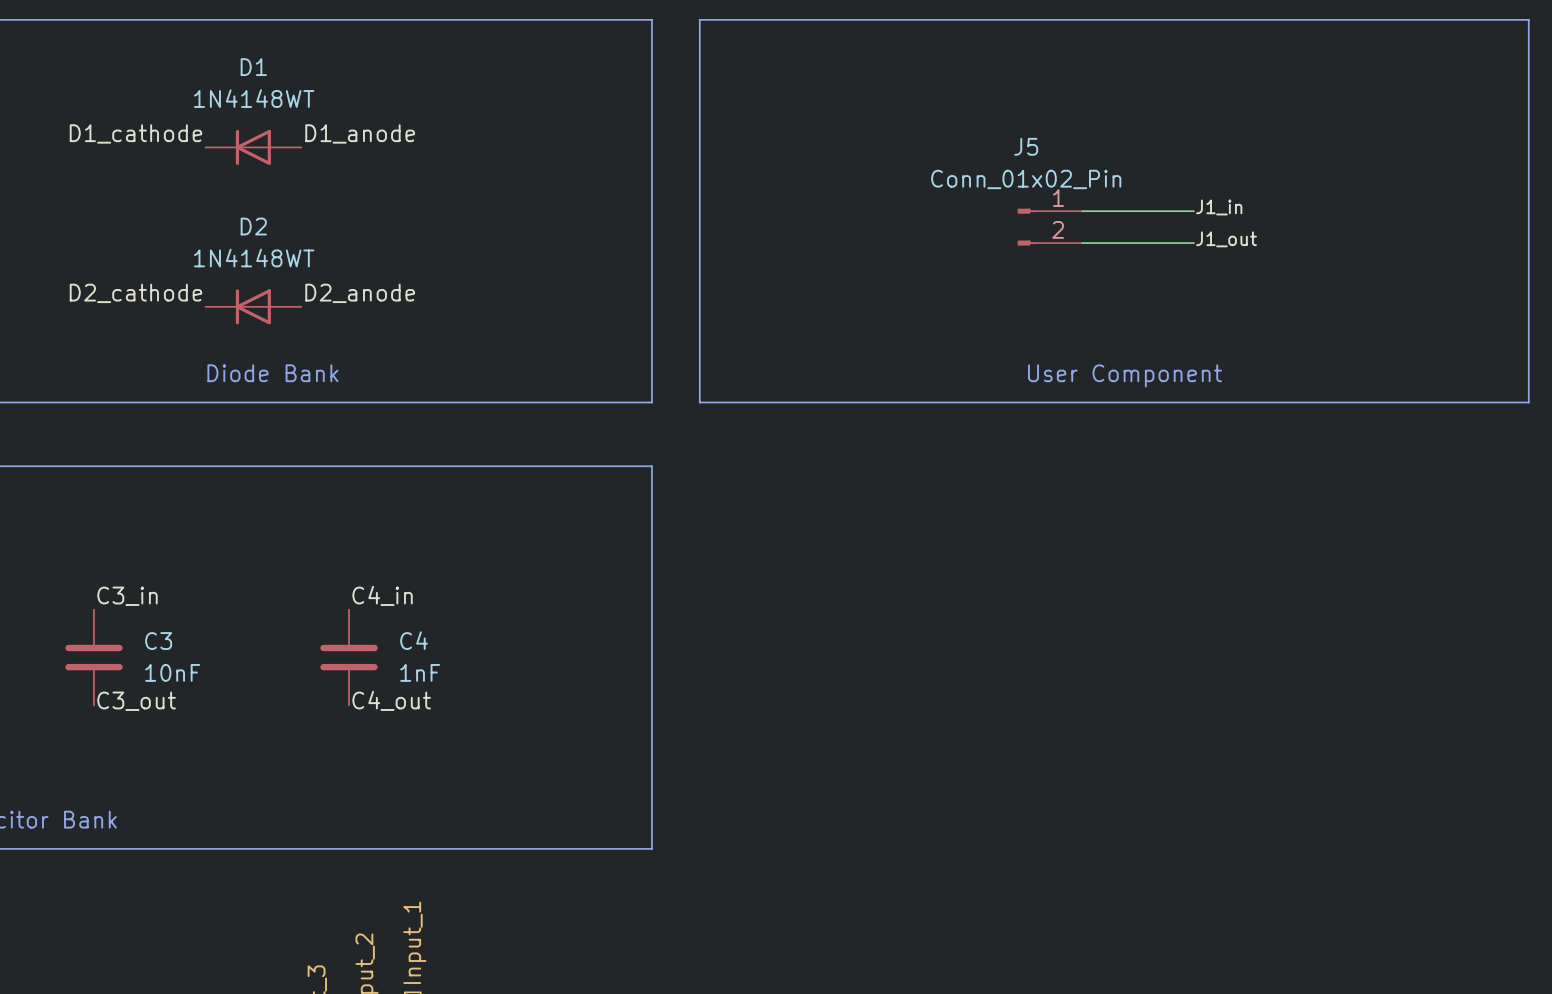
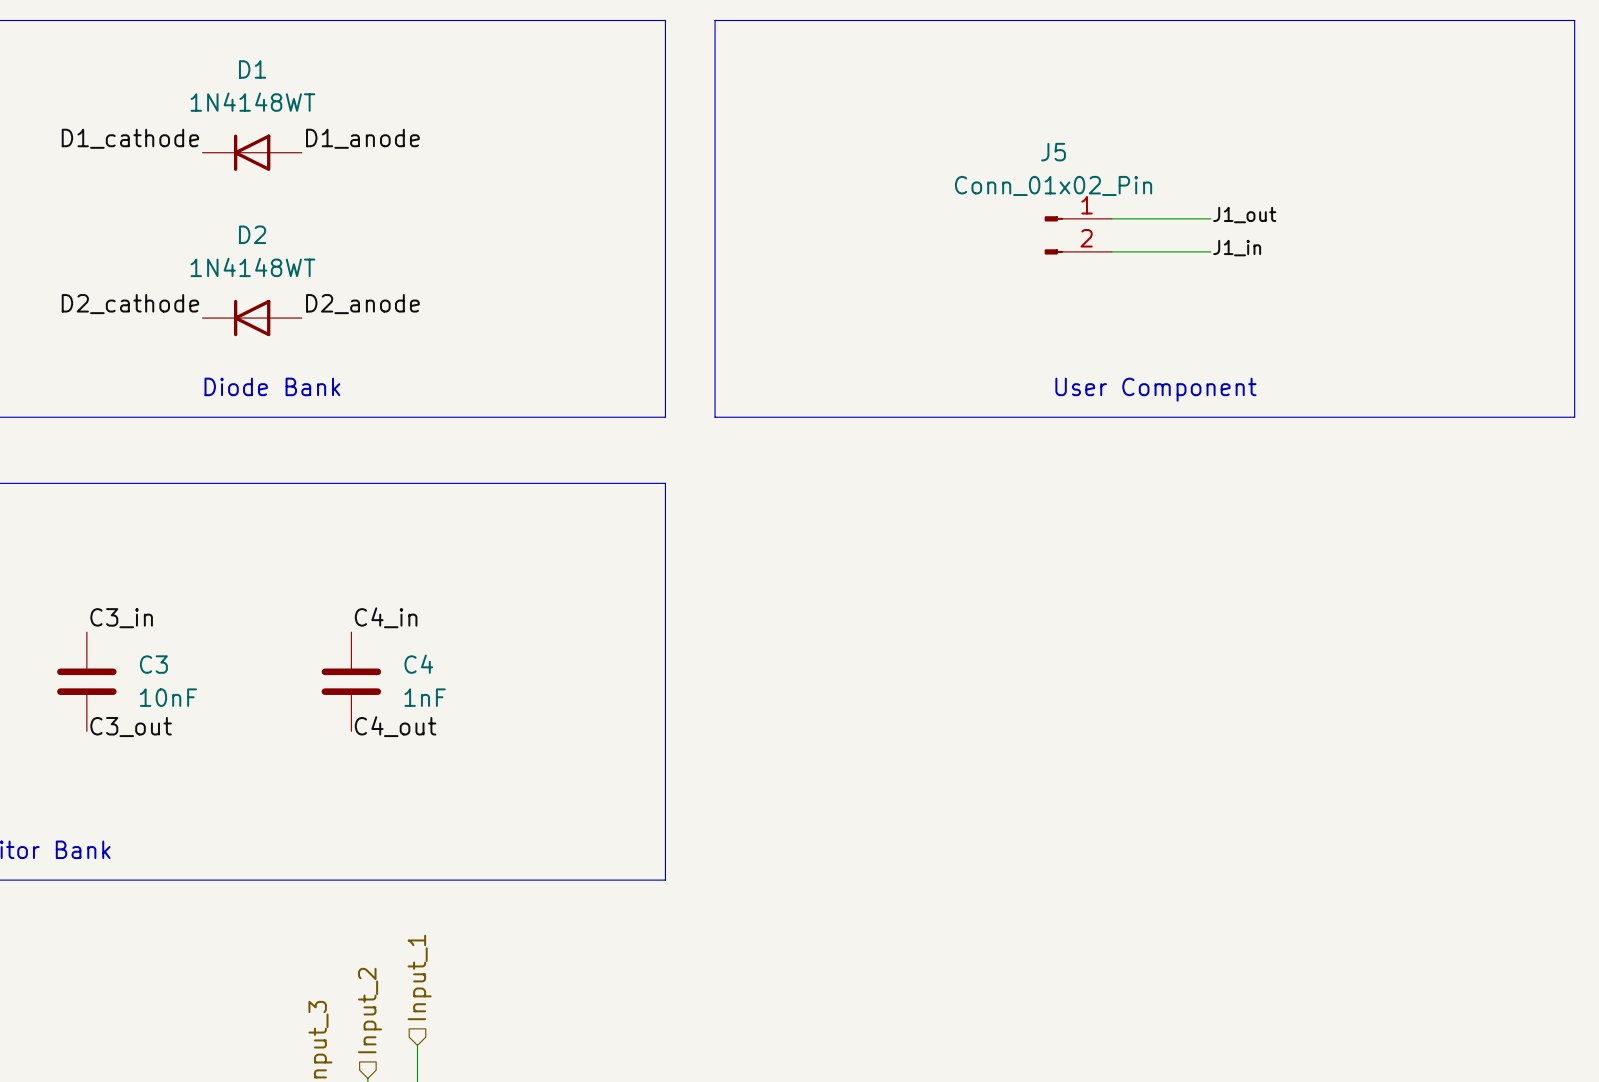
label position: J1_in (1219, 207) -> J1_in (1237, 248)
wire: (1178, 211) (1193, 211) -> none
label position: J1_out (1226, 239) -> J1_out (1244, 215)
wire: (1178, 243) (1193, 243) -> none

